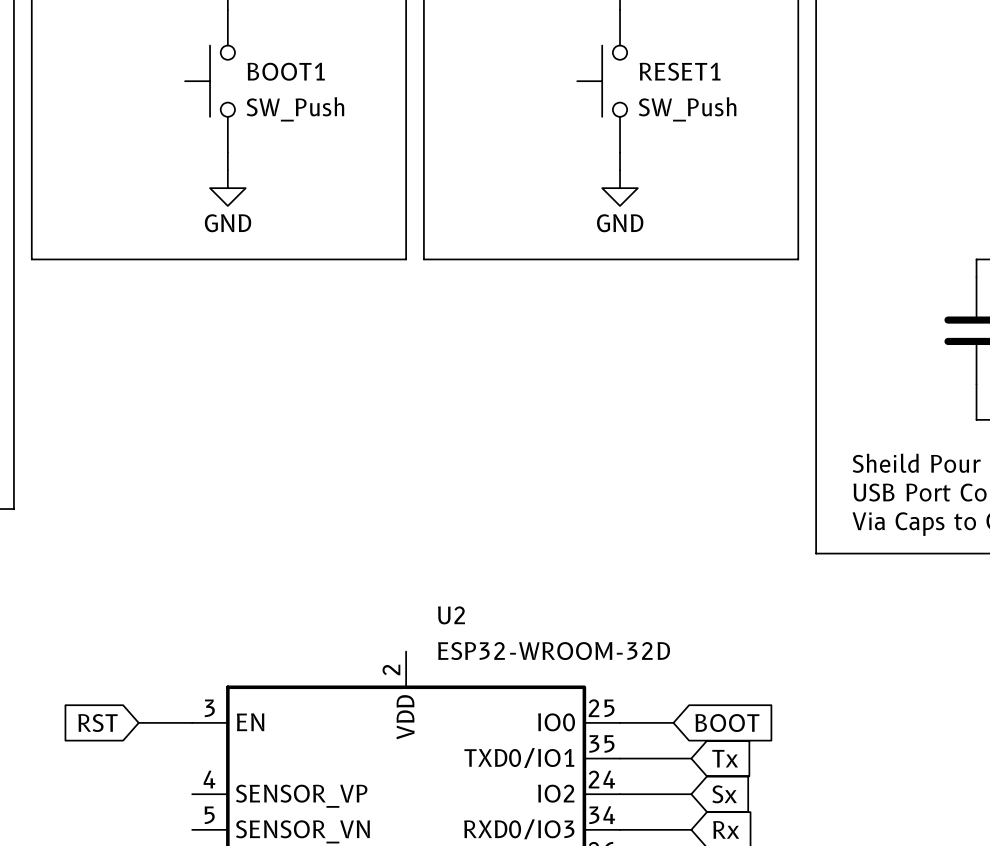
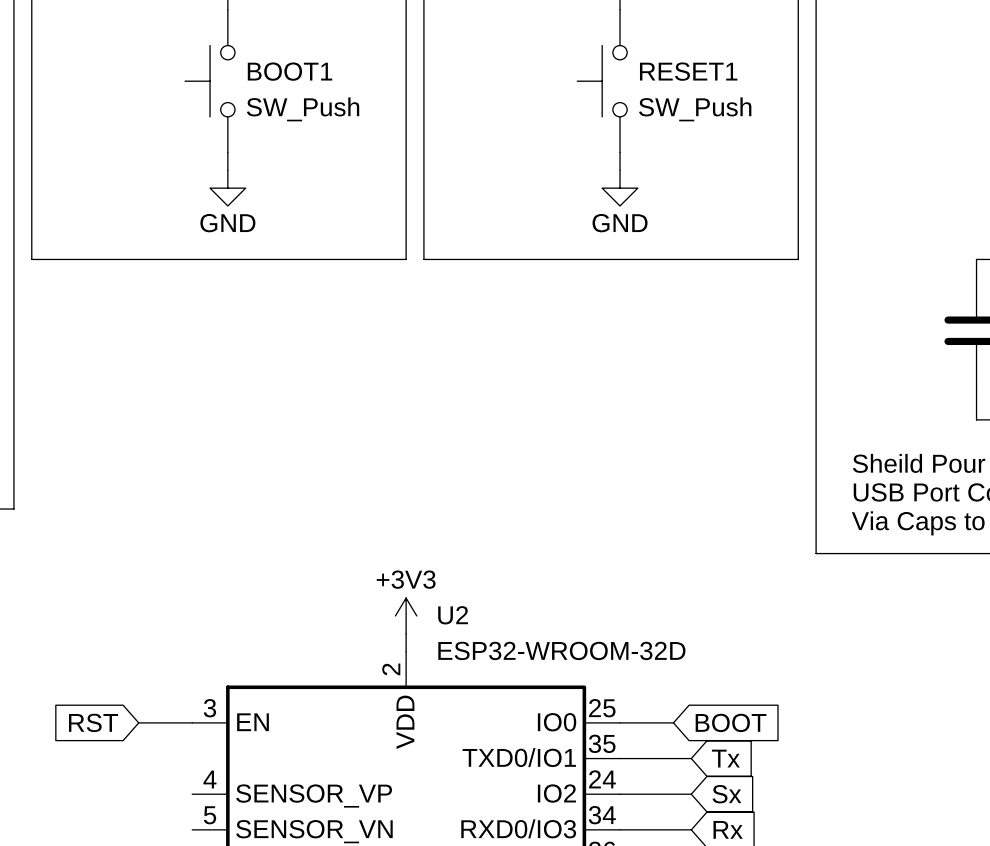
power symbol: none -> +3V3 (406, 615)
wire: none -> (406, 633) (406, 651)

